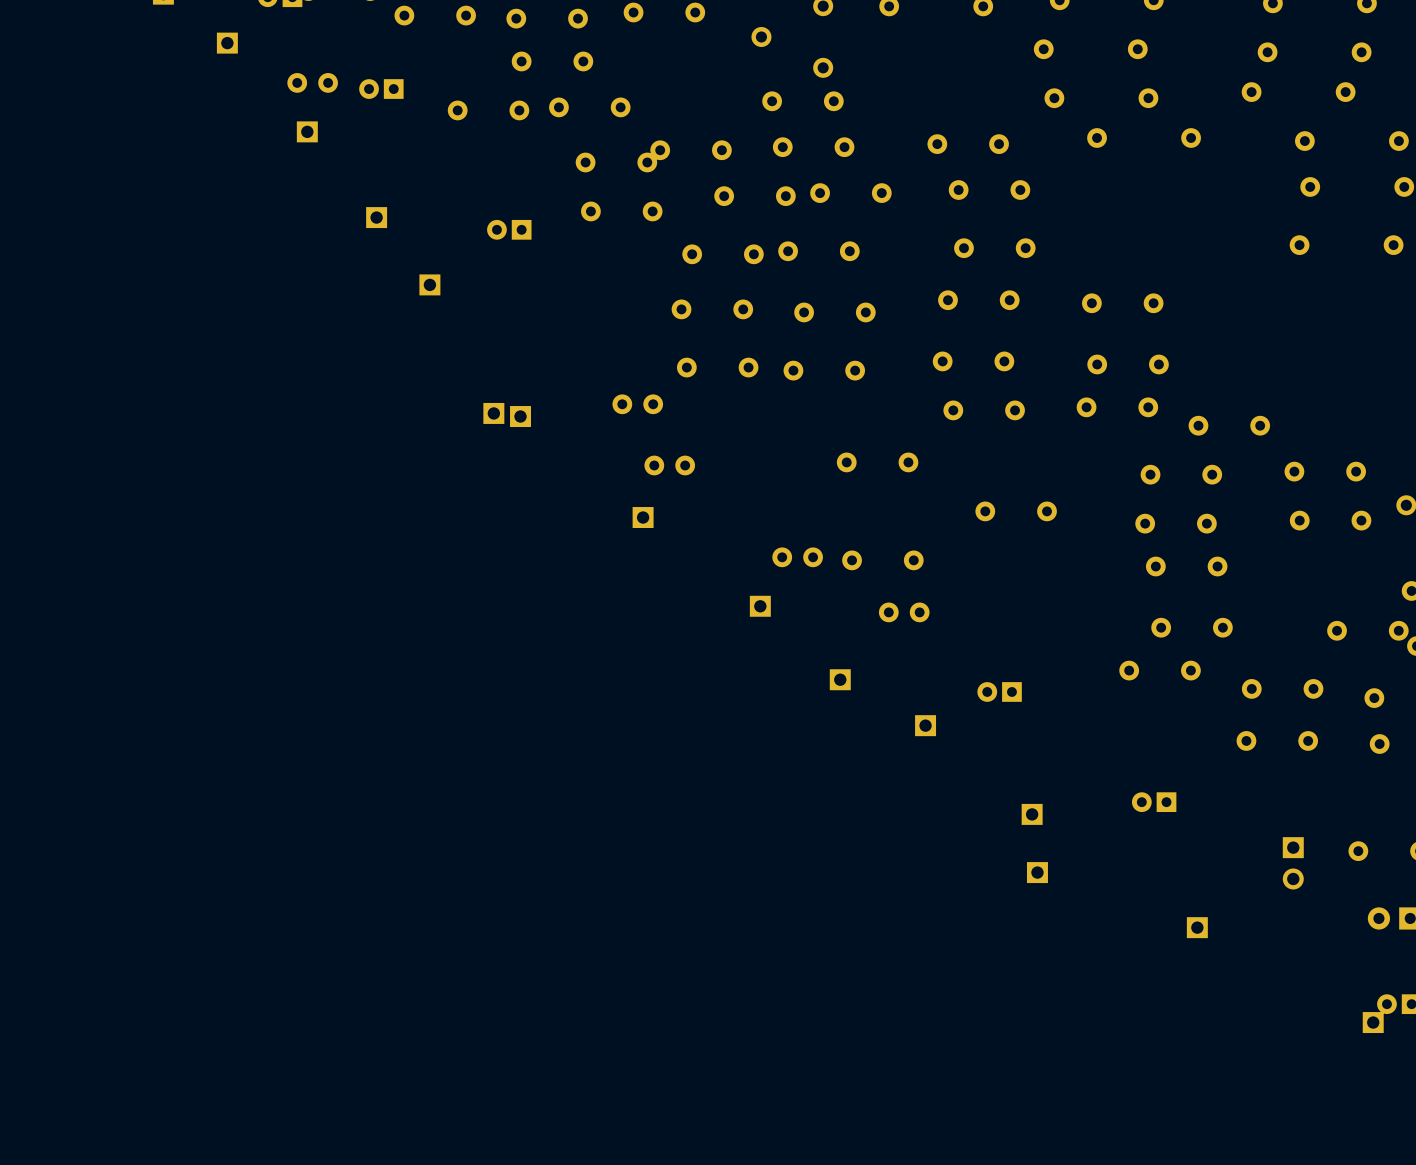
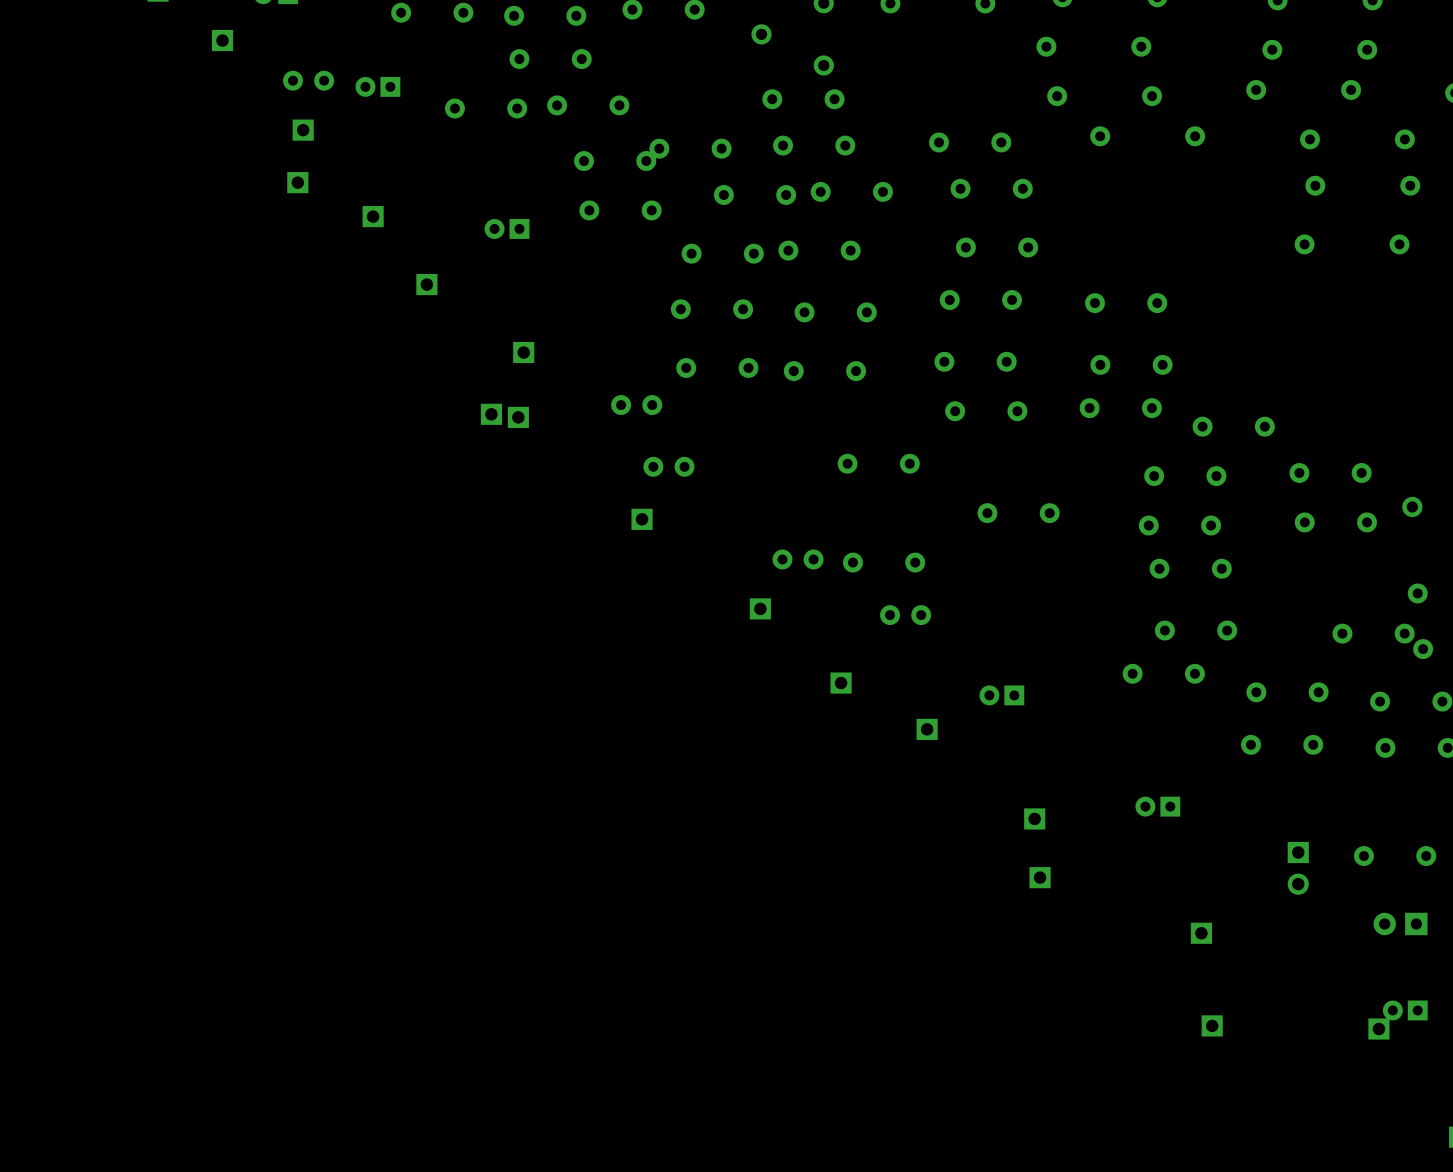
part: none -> (297, 182)
part: none -> (523, 352)
part: none -> (1212, 1025)

